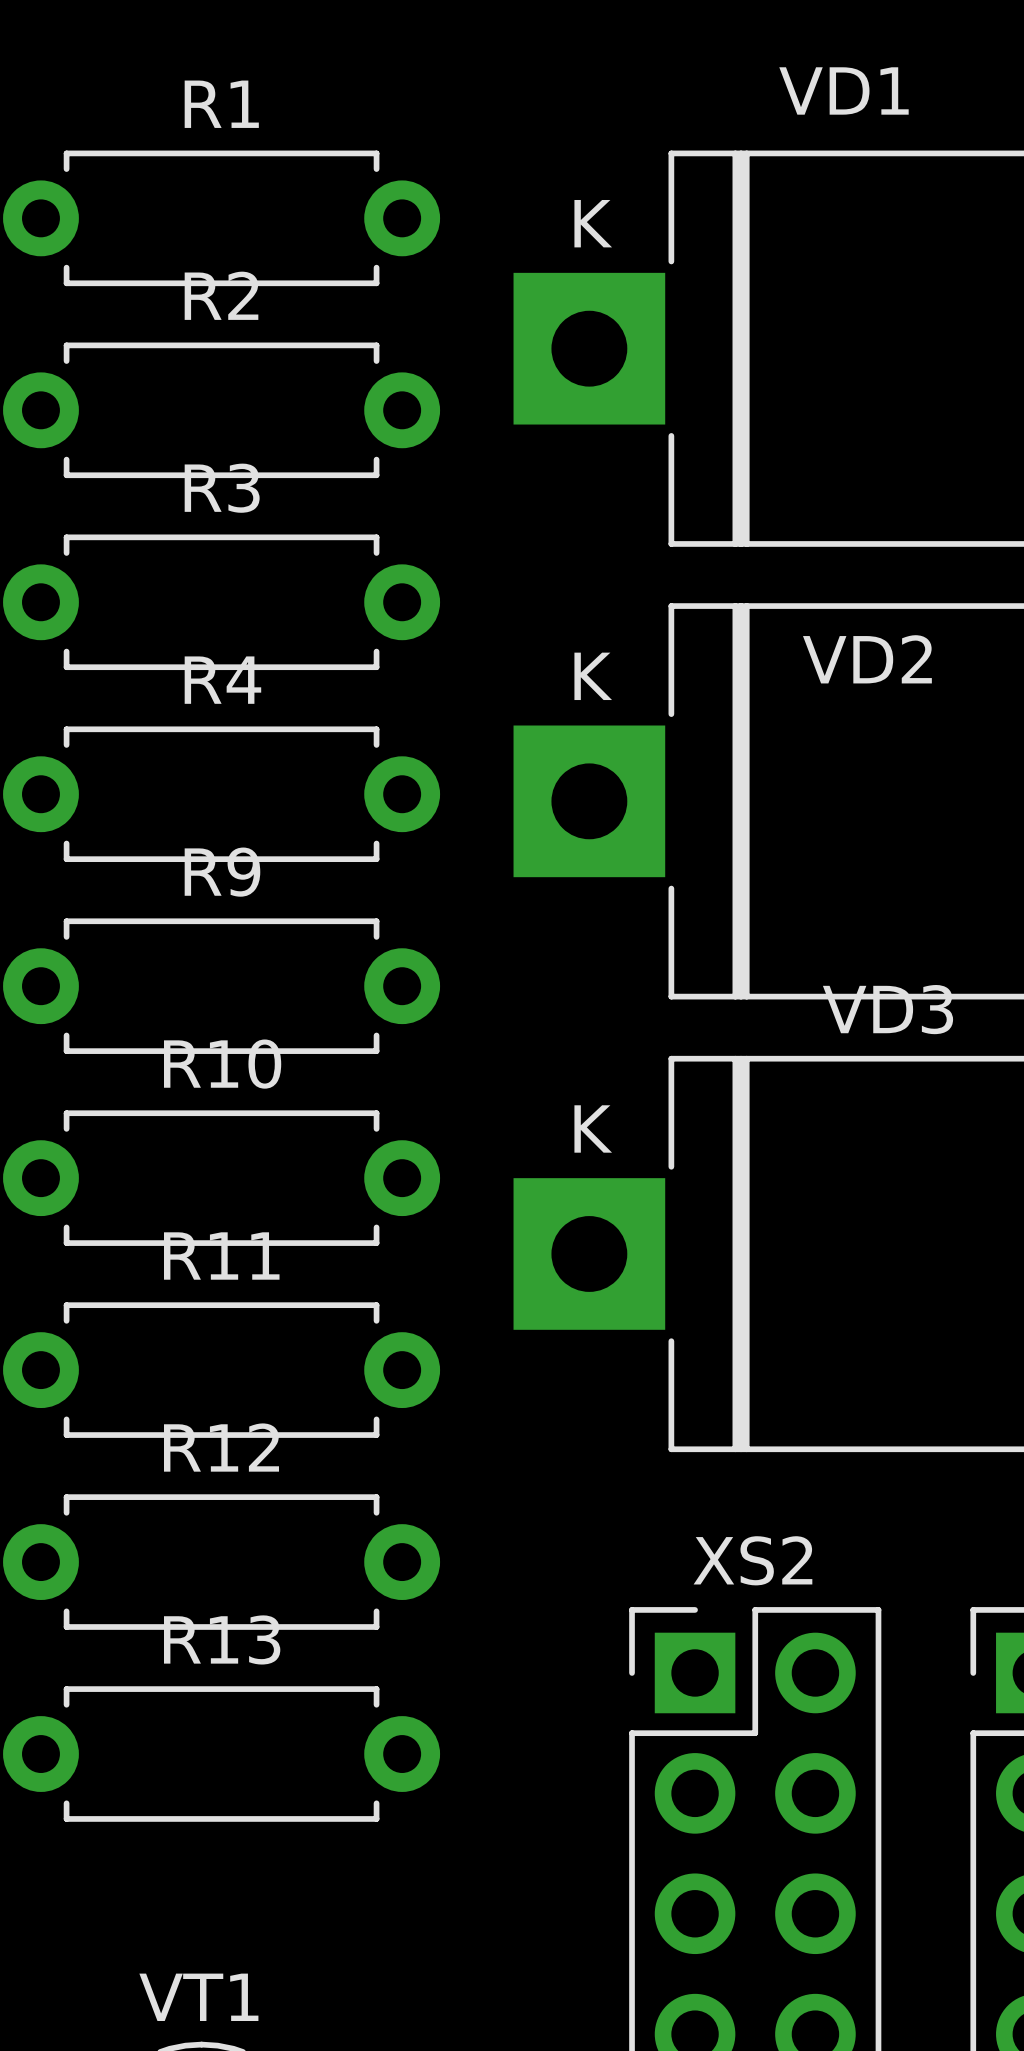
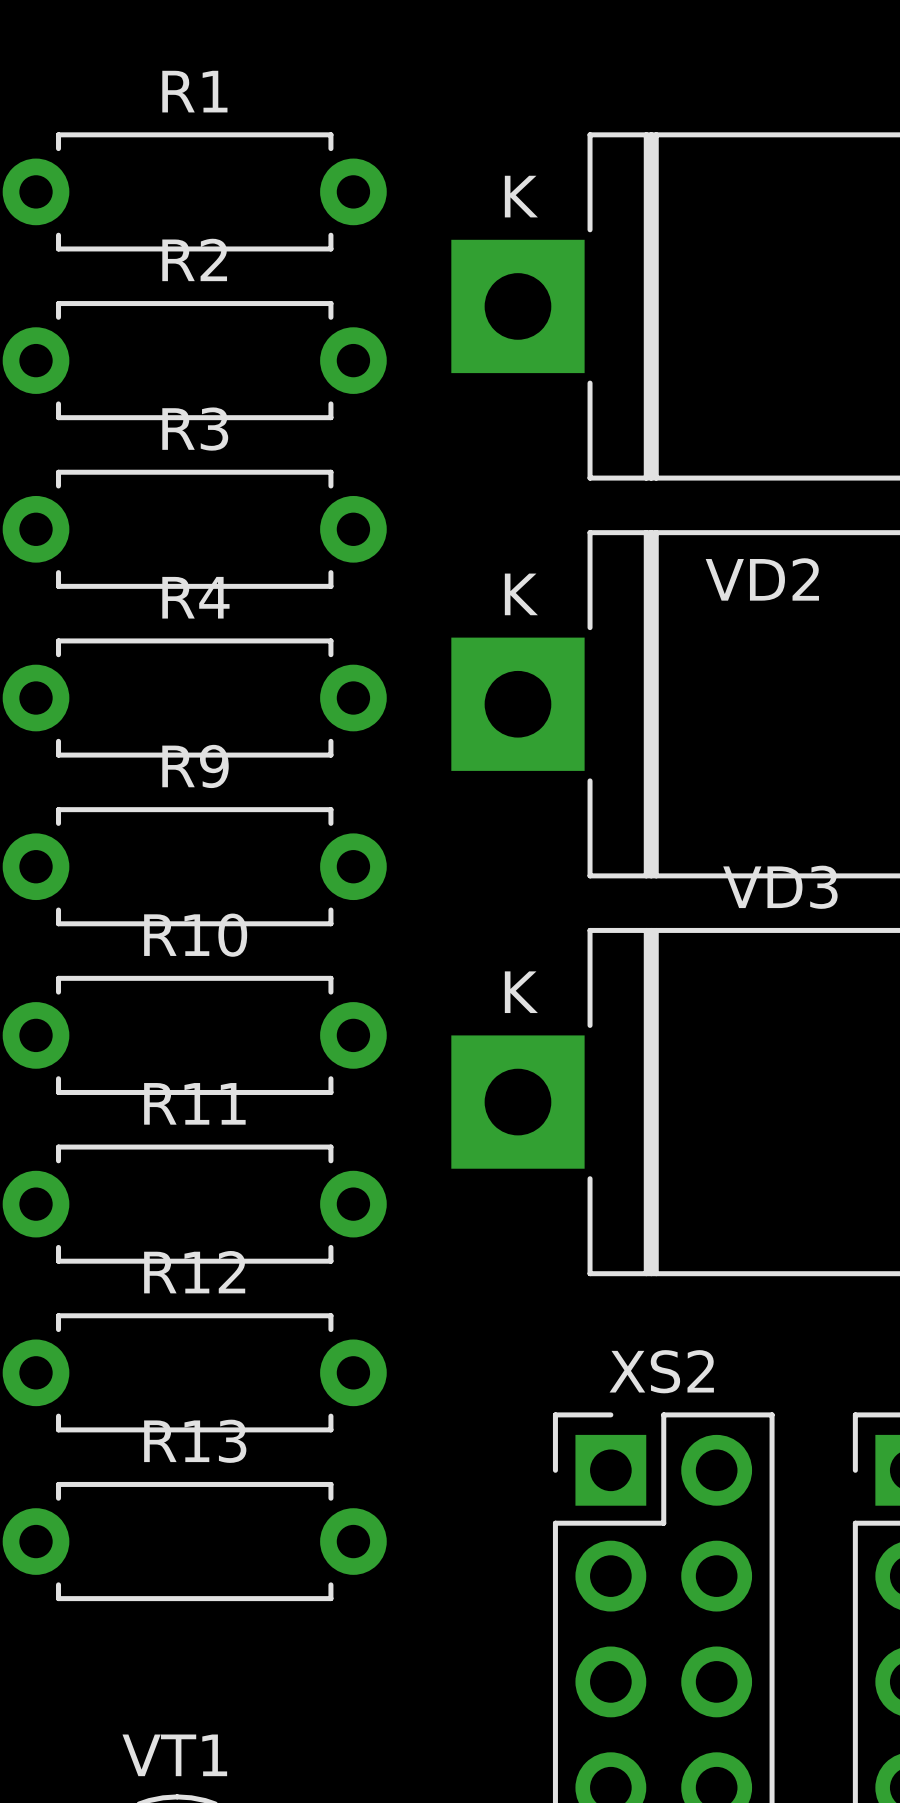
VD1 name: VD1 (843, 90) -> none

